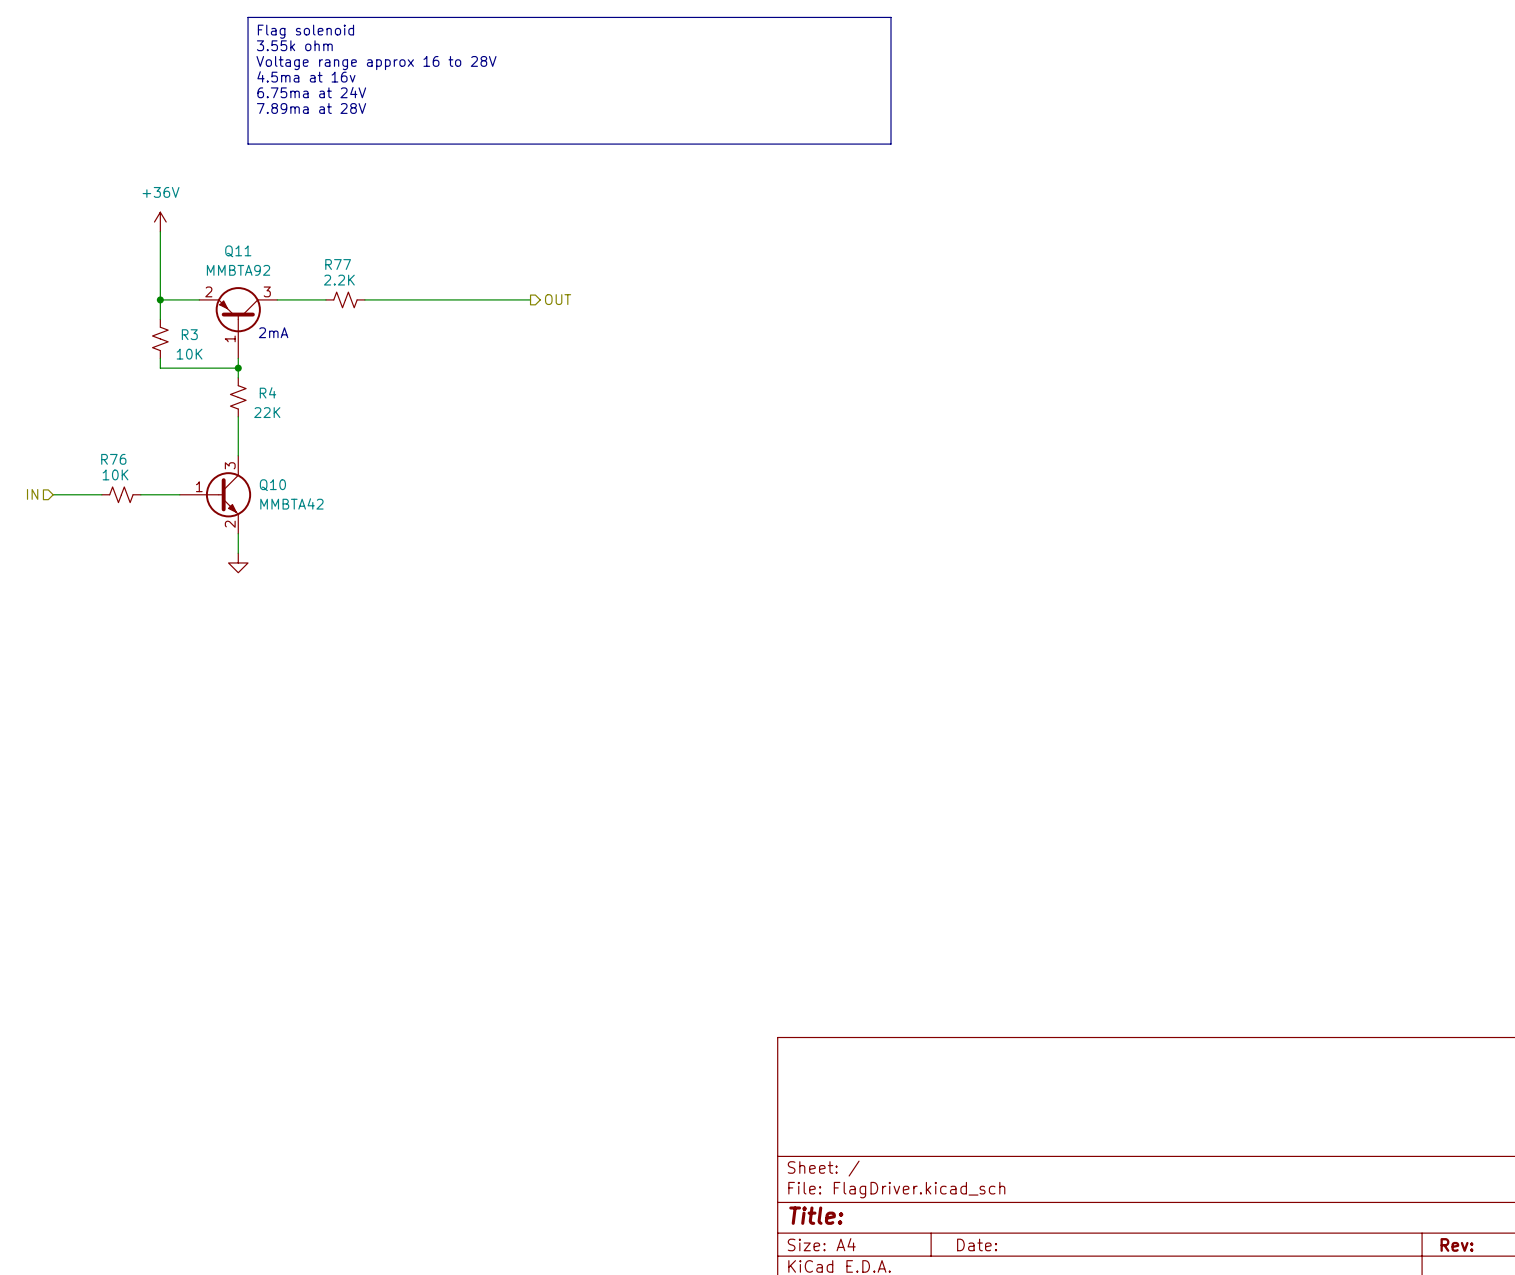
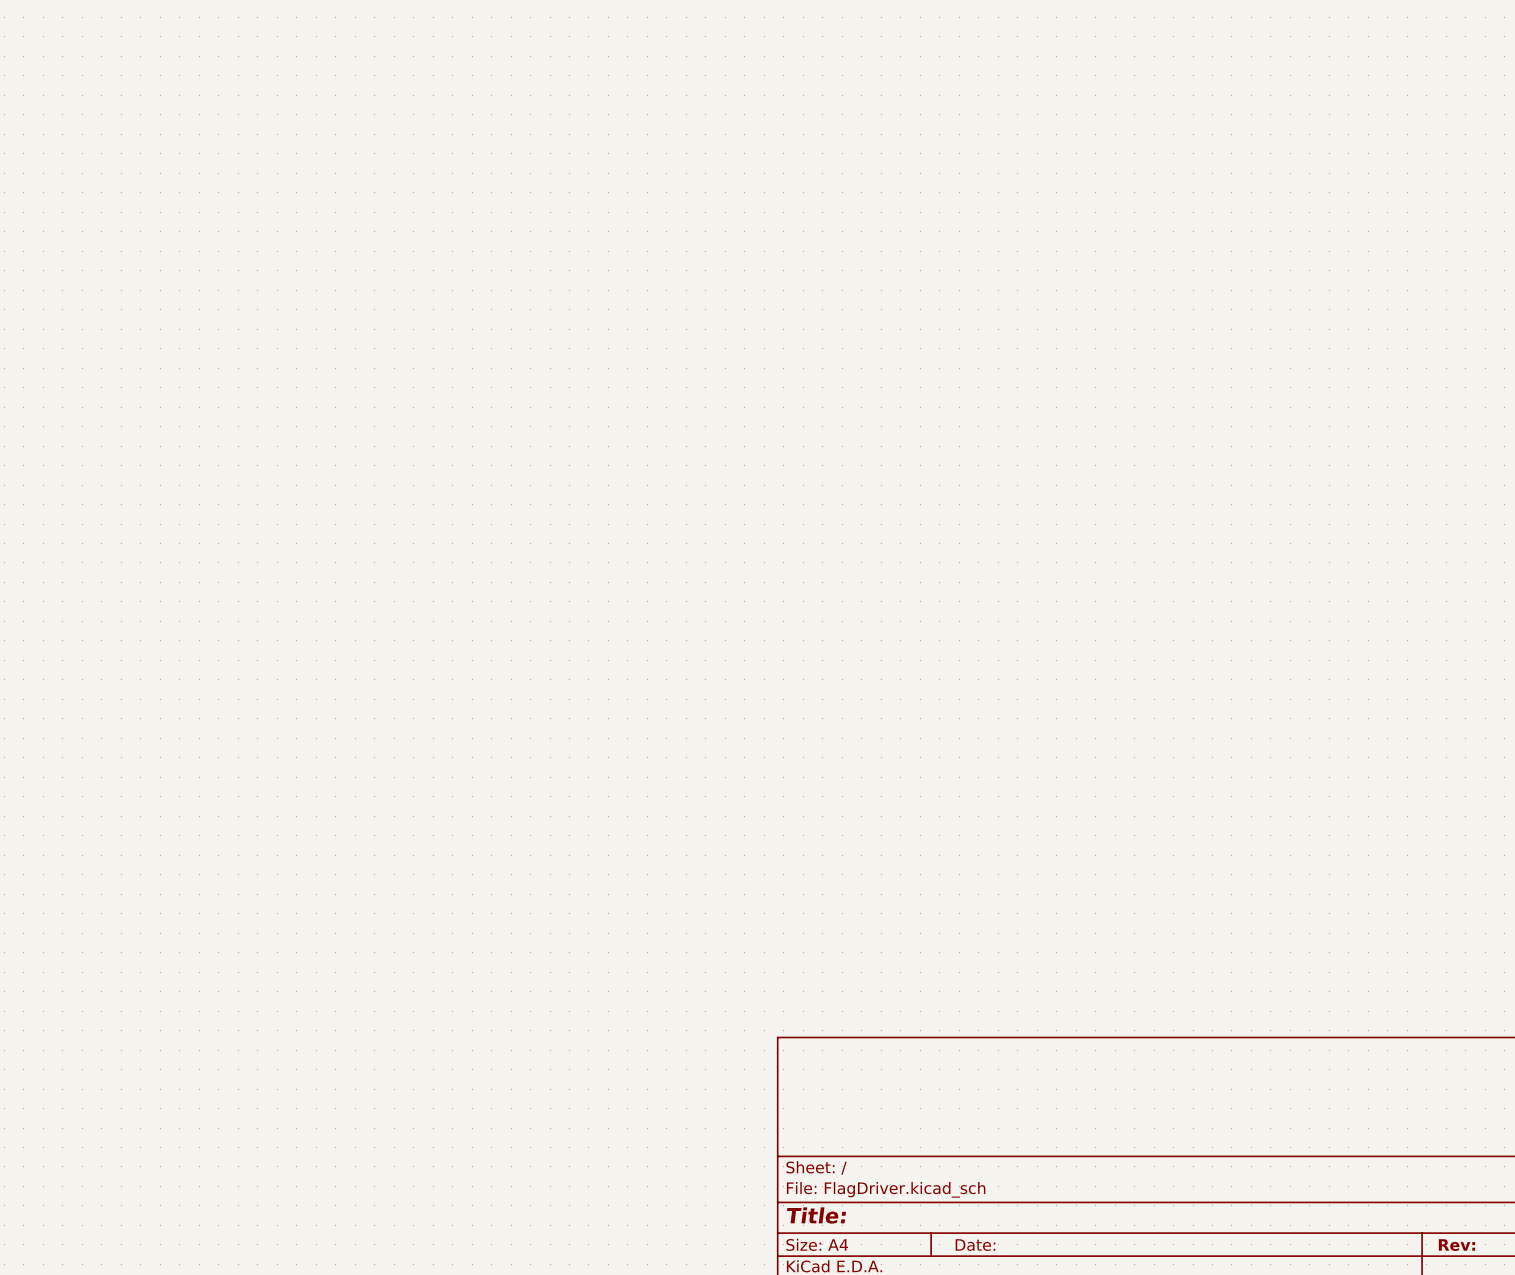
line: (248, 17) (891, 17) (891, 144) (248, 144) (248, 17) -> none
text: Flag solenoid (305, 31) -> none
text: 3.55k ohm (294, 45) -> none
text: Voltage range approx 16 to 28V (376, 63) -> none
text: 4.5ma at 16v (306, 76) -> none
text: 6.75ma at 24V (311, 92) -> none
text: 7.89ma at 28V (311, 108) -> none
power symbol: +36V (160, 222) -> none
wire: (160, 231) (160, 319) -> none
wire: (160, 299) (199, 299) -> none
junction: (160, 299) -> none
wire: (277, 299) (325, 299) -> none
R77: 2.2K (345, 299) -> none
wire: (364, 299) (530, 299) -> none
hierarchical label: OUT (558, 299) -> none
Q11: MMBTA92 (238, 322) -> none
text: 2mA (273, 332) -> none
R3: 10K (160, 338) -> none
wire: (160, 358) (160, 368) (238, 368) -> none
wire: (238, 358) (238, 377) -> none
junction: (238, 368) -> none
R4: 22K (238, 397) -> none
wire: (238, 416) (238, 455) -> none
hierarchical label: IN (32, 494) -> none
wire: (53, 494) (101, 494) -> none
R76: 10K (121, 494) -> none
wire: (140, 494) (179, 494) -> none
Q10: MMBTA42 (215, 494) -> none
wire: (238, 533) (238, 553) -> none
power symbol: (238, 562) -> none

